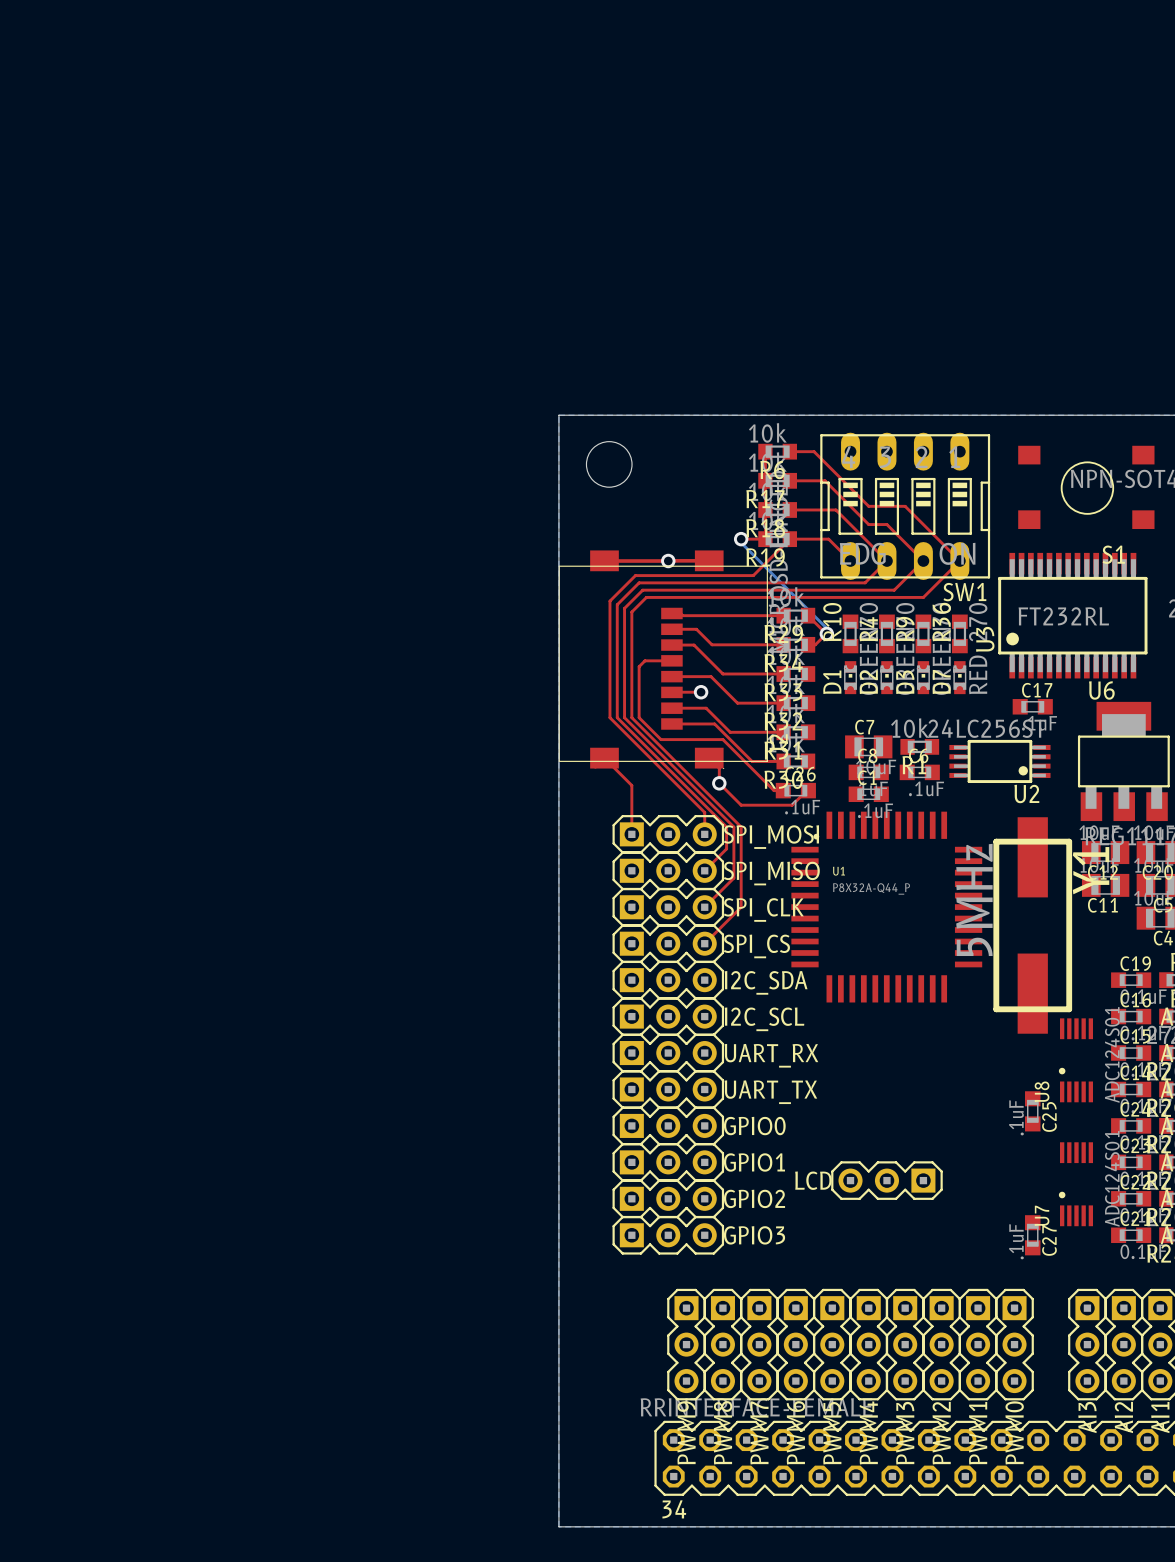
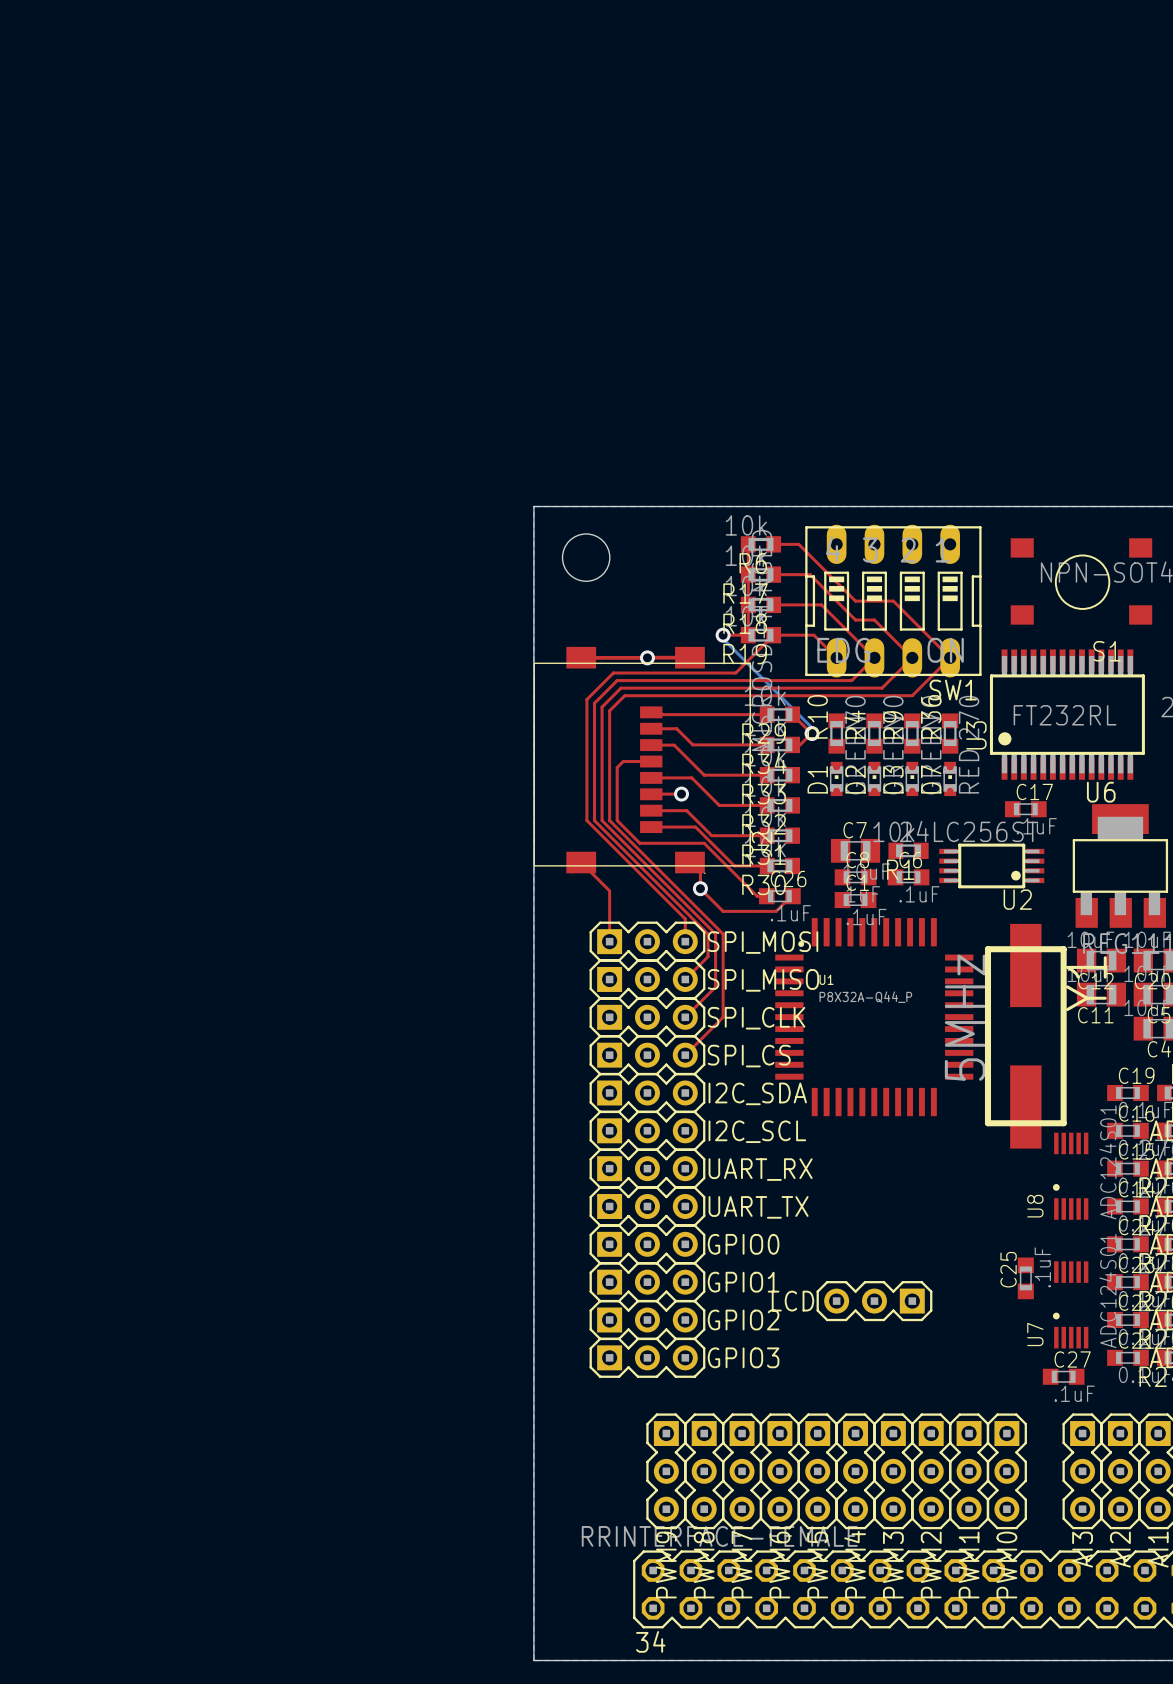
C25 position: (1032, 1111) -> (1025, 1278)
C25 name position: C25 (1049, 1116) -> C25 (1008, 1269)
C25 value position: .1uF (1016, 1117) -> .1uF (1042, 1267)
C27 rotation: 0° (1032, 1235) -> 90° clockwise (1063, 1376)
C27 position: (1032, 1235) -> (1063, 1376)
C27 value position: .1uF (1016, 1241) -> .1uF (1074, 1393)

